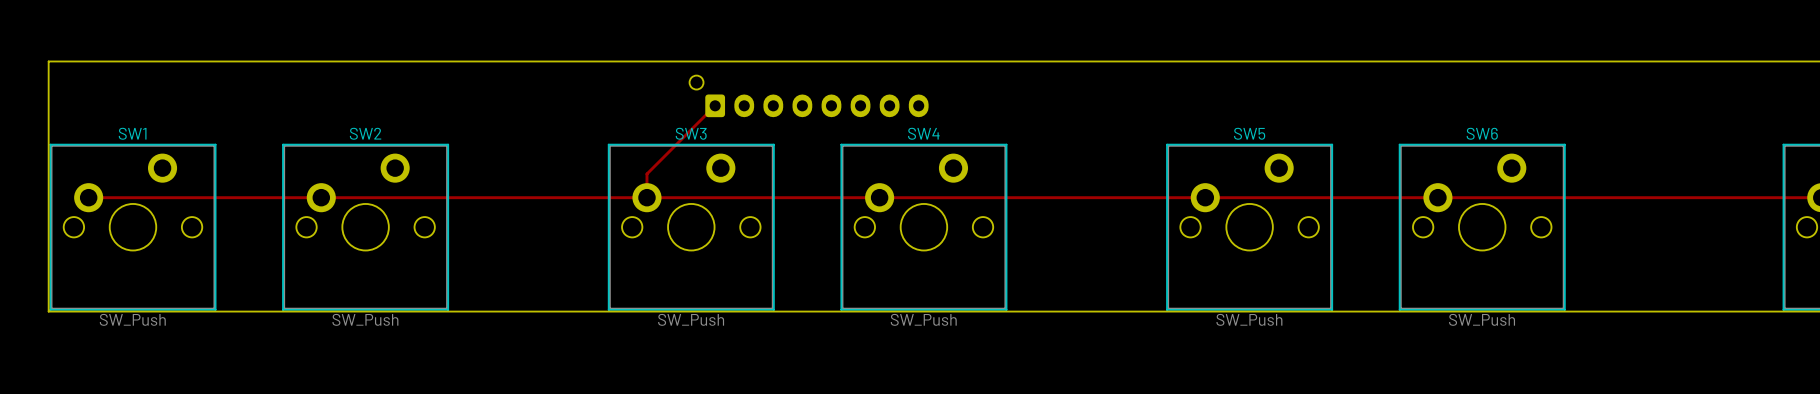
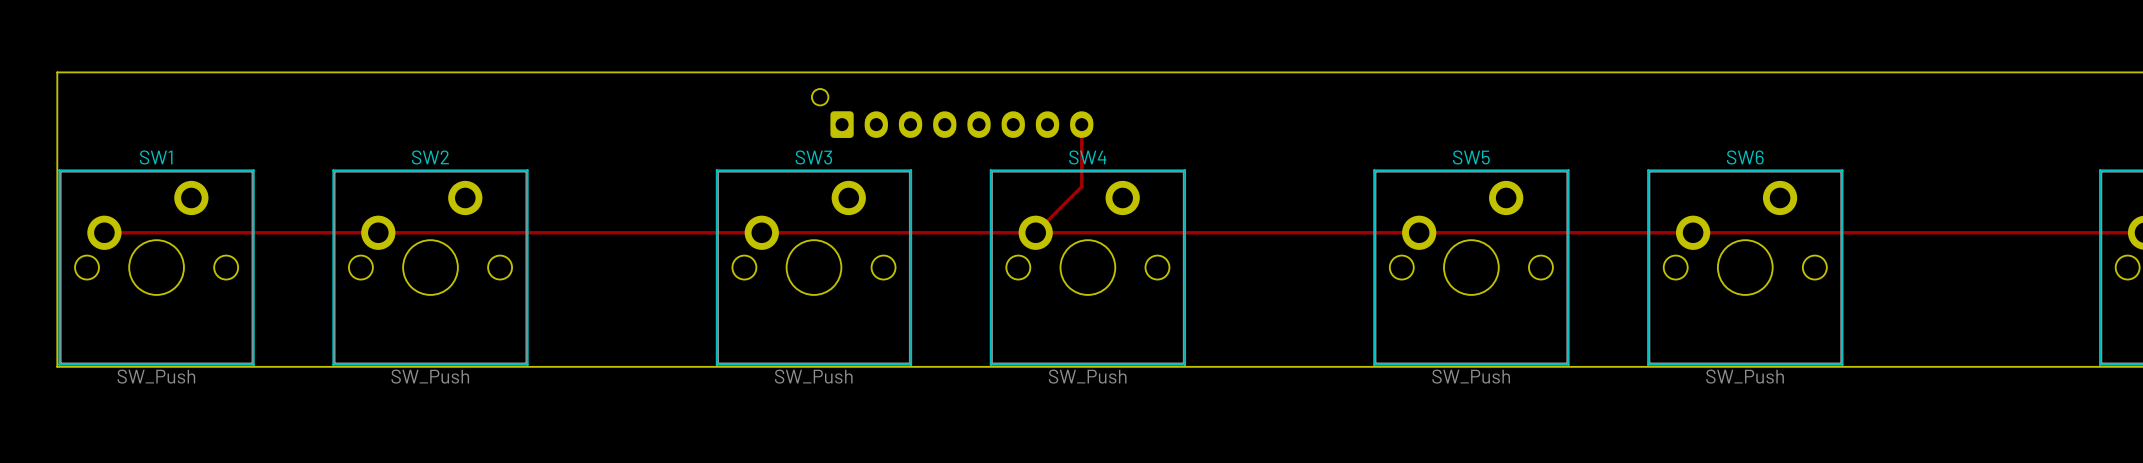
track: (715, 105) (646, 173) (646, 197) -> none
track: none -> (1081, 124) (1081, 186) (1035, 232)

